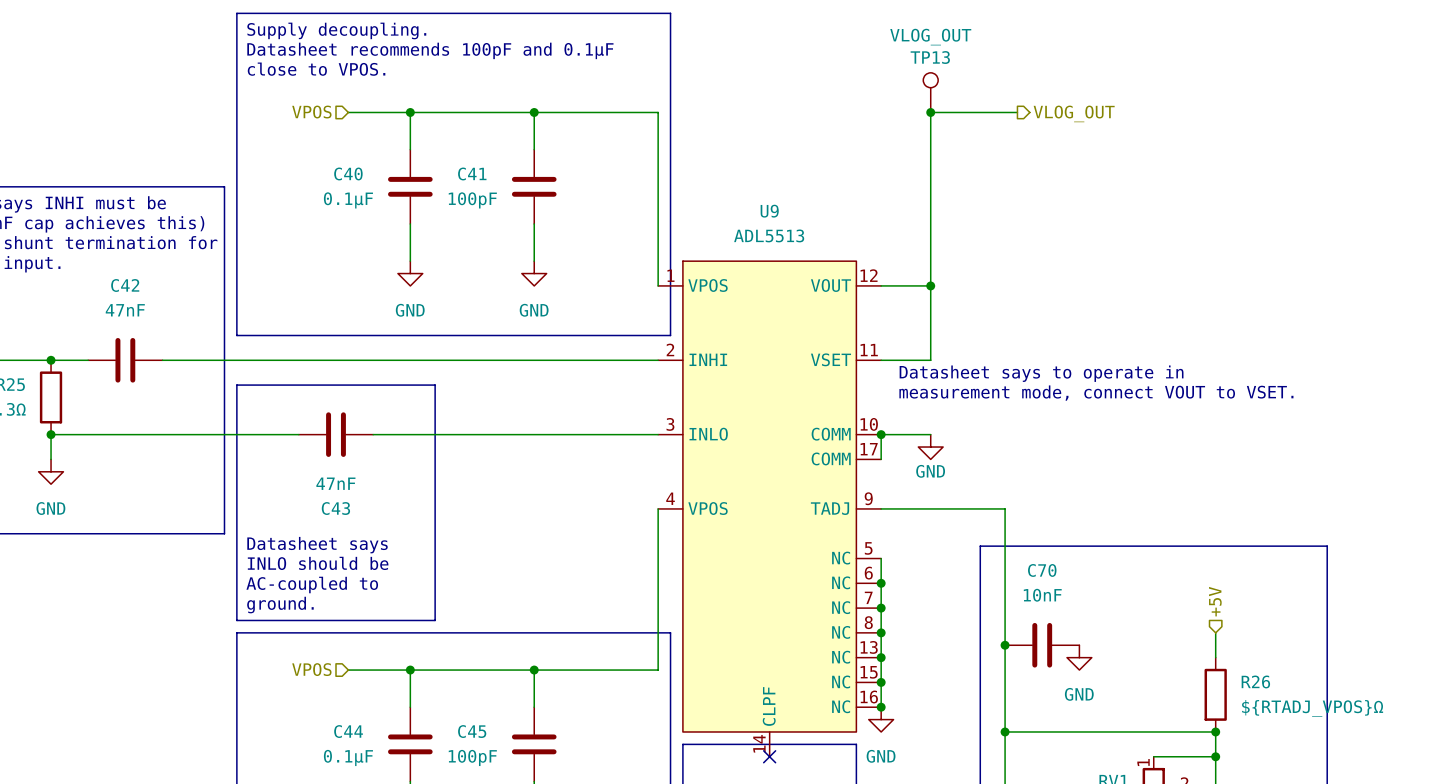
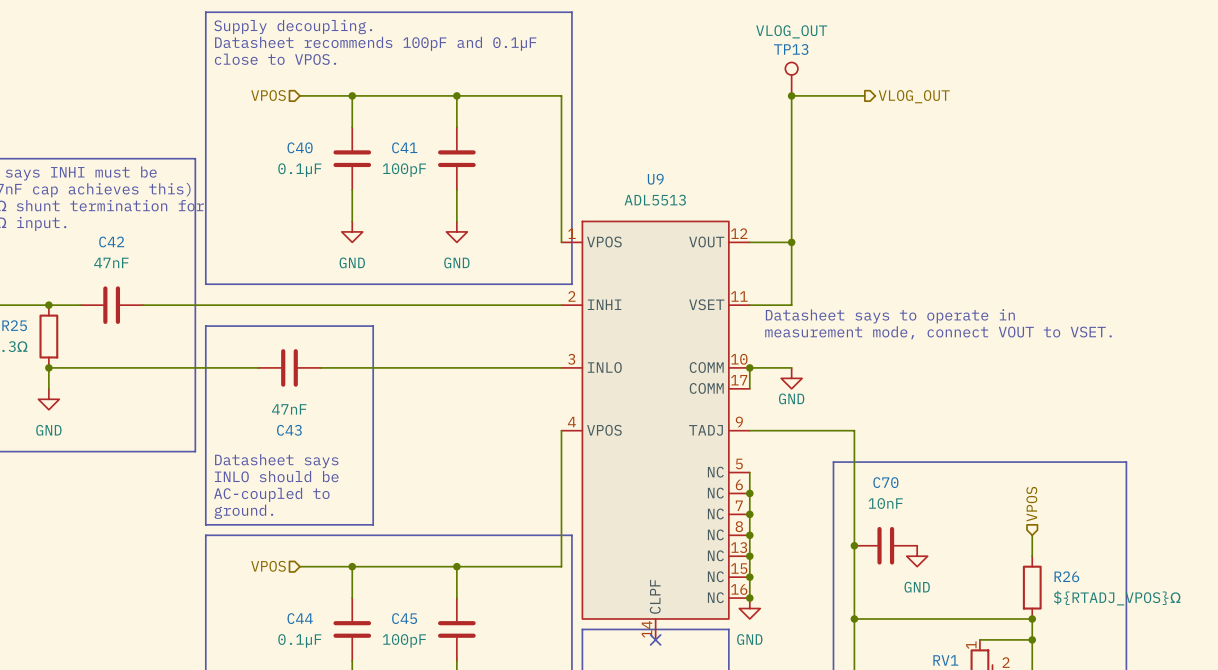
hierarchical label: +5V (1215, 601) -> VPOS (1031, 504)

